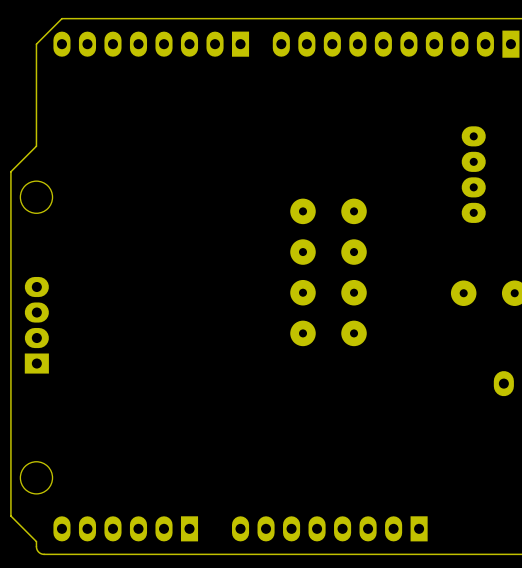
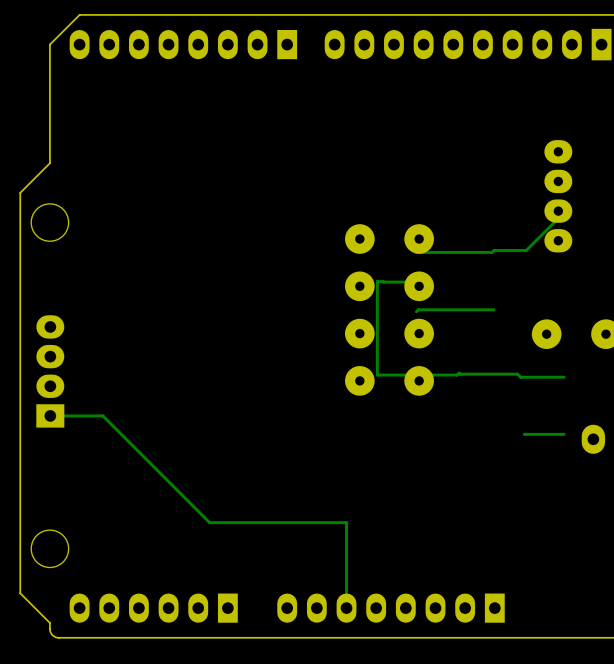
bottom track: none -> (565, 211) (526, 250) (416, 252)
bottom track: none -> (416, 282) (377, 281) (377, 375) (457, 375) (459, 373) (517, 374) (520, 377) (564, 377)
bottom track: none -> (494, 309) (418, 309) (416, 311)
bottom track: none -> (50, 415) (102, 415) (209, 522) (346, 522) (346, 608)
bottom track: none -> (564, 434) (524, 434)

